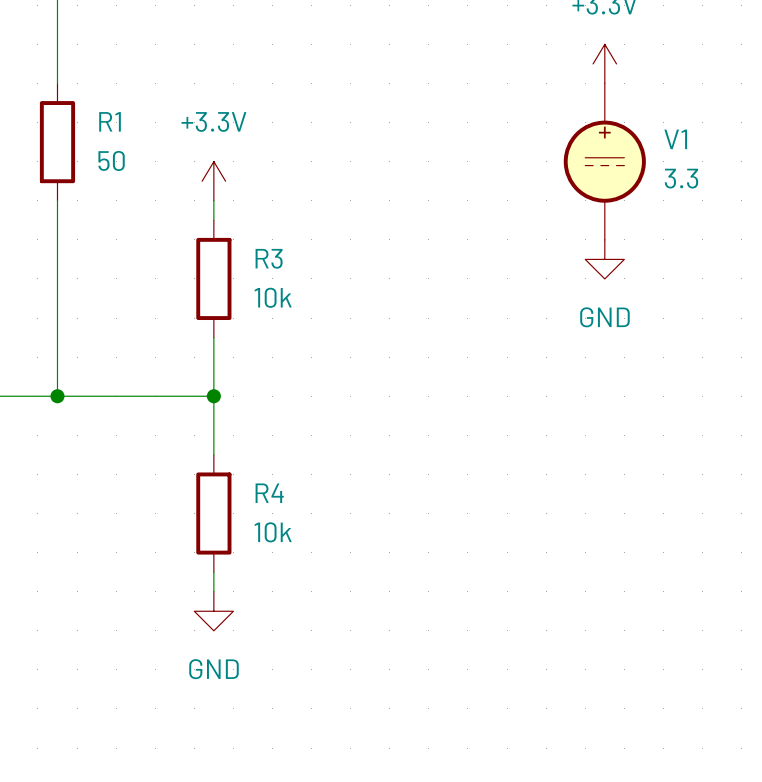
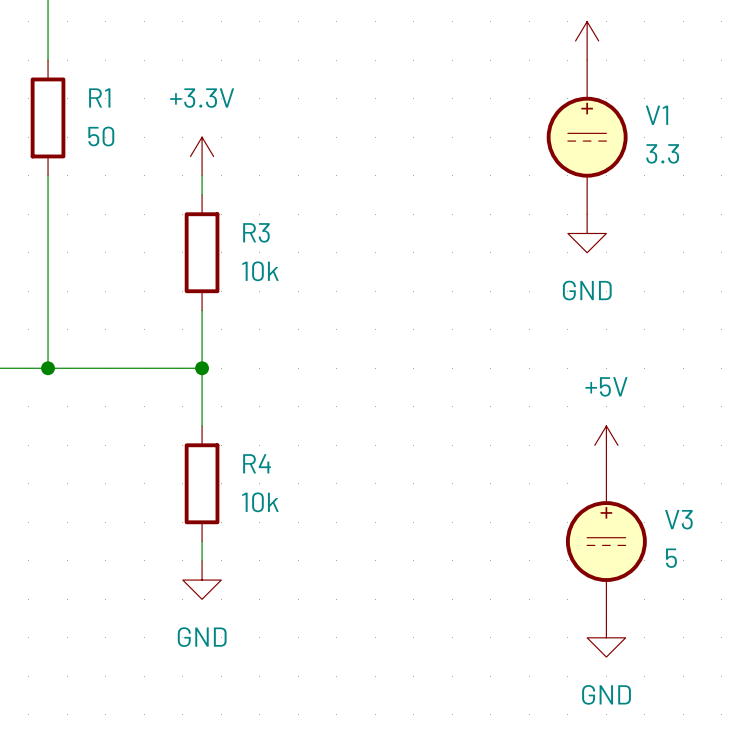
power symbol: none -> +5V (606, 445)
V3: none -> 5 (606, 541)
power symbol: none -> GND (606, 637)

